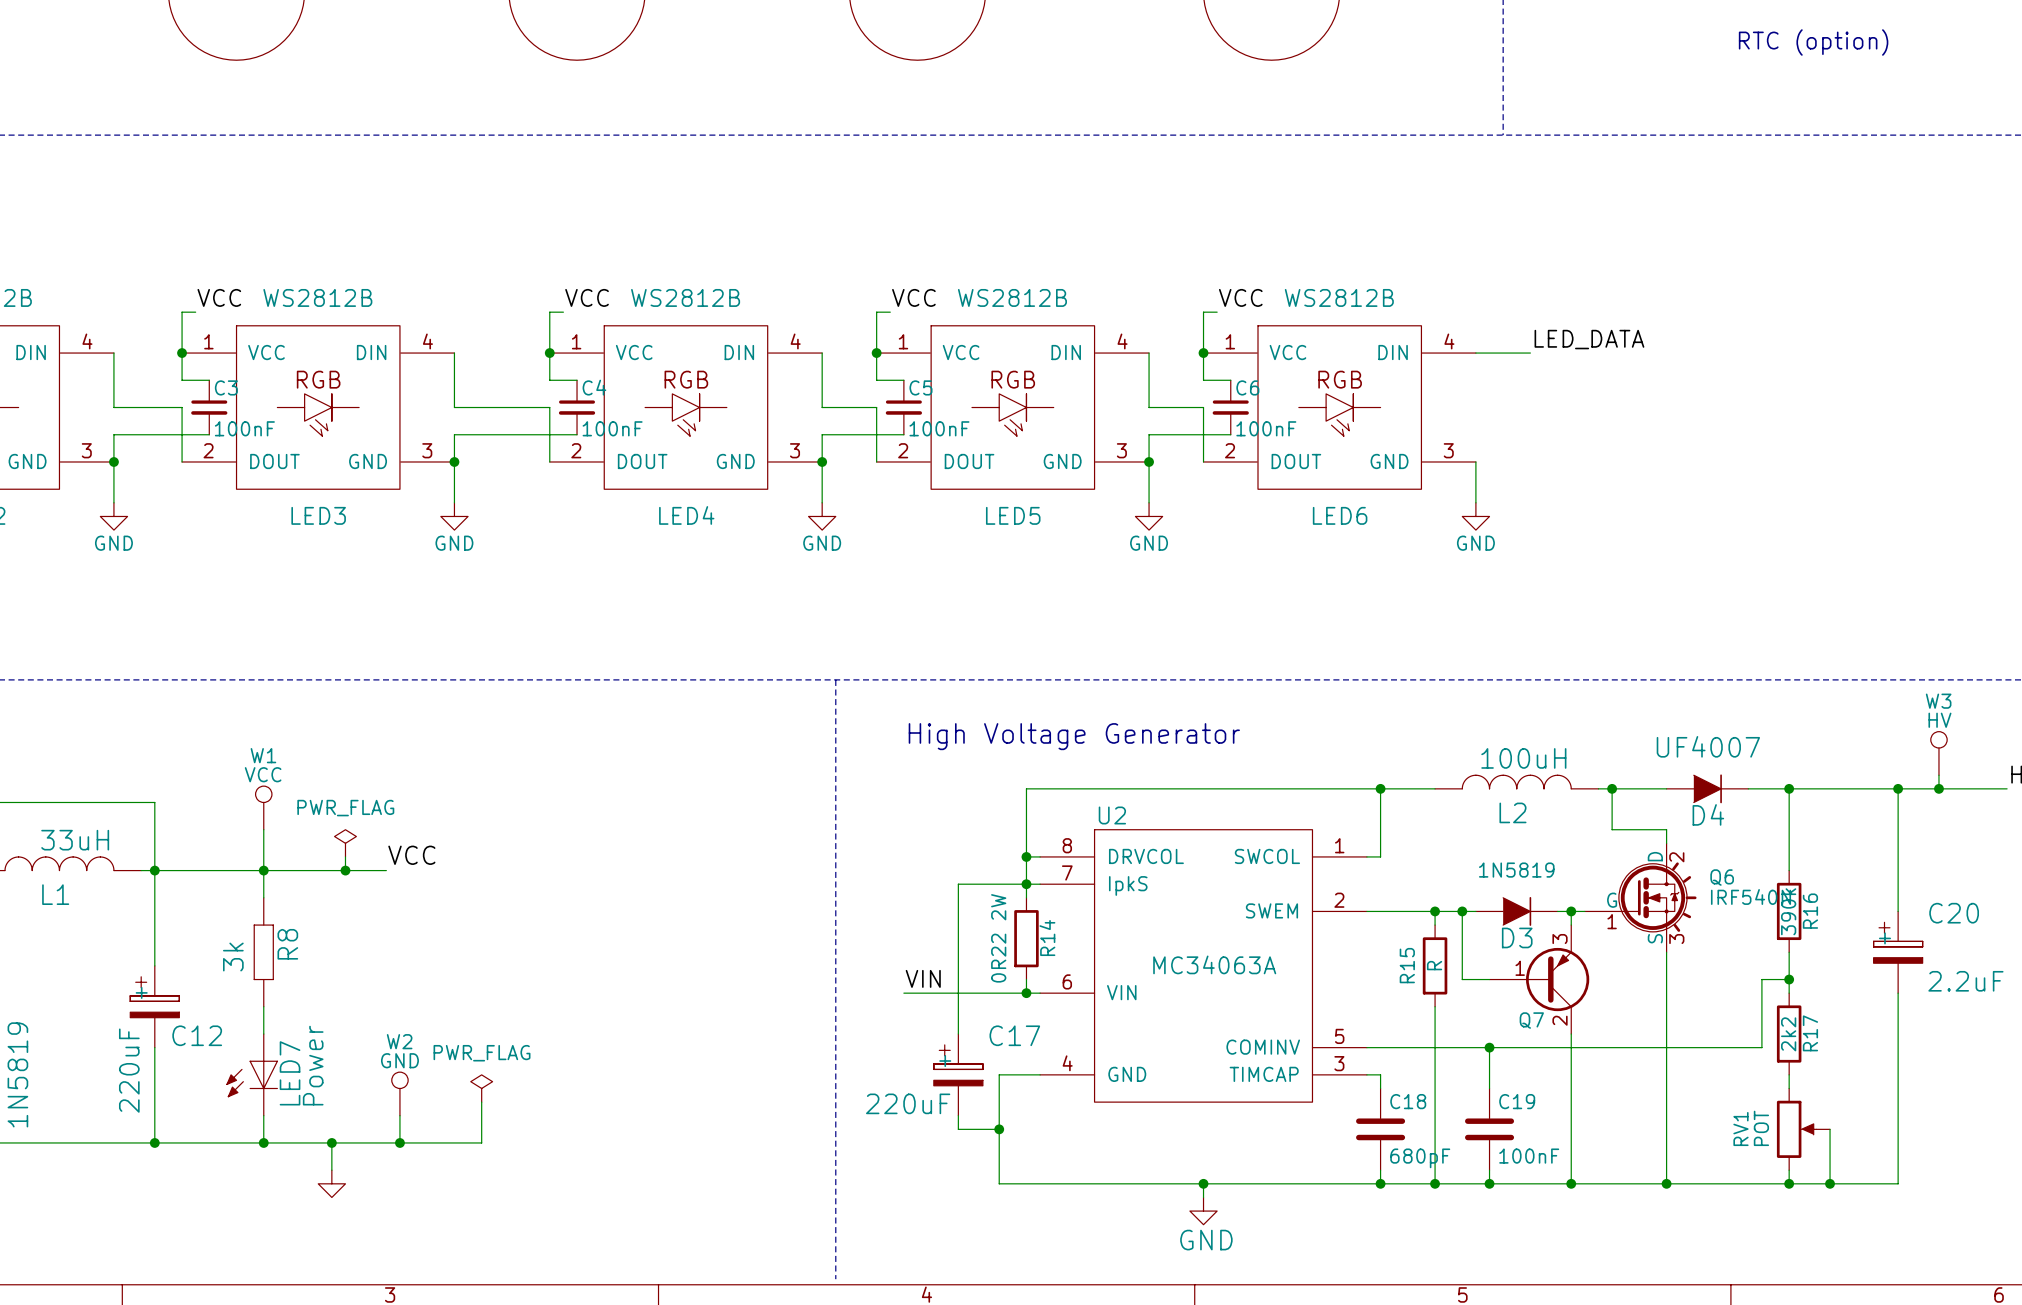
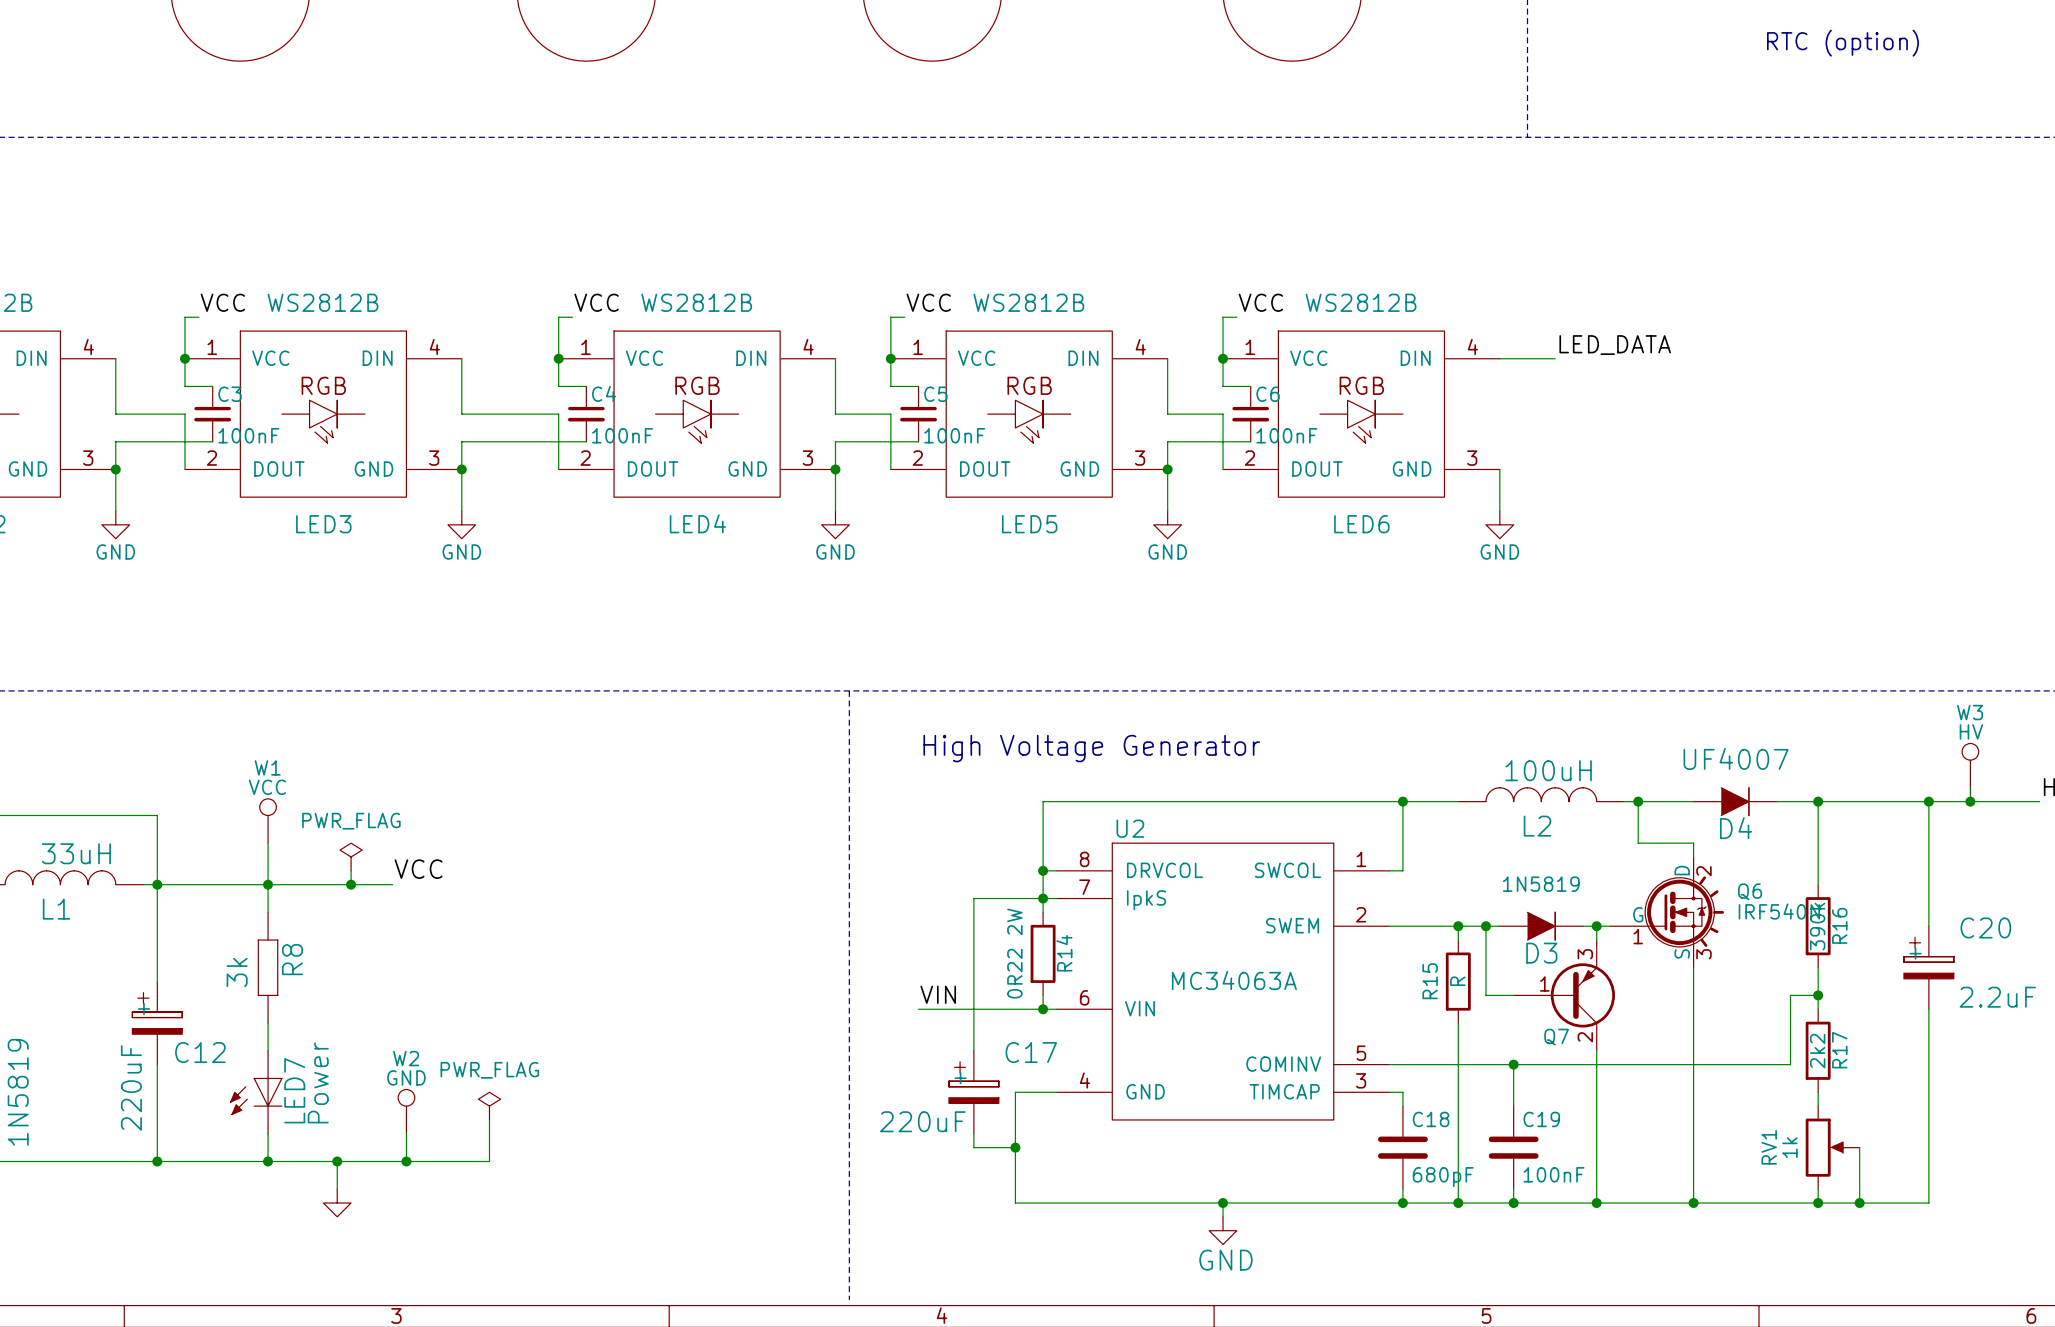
RV1 value: POT (1761, 1128) -> 1k (1789, 1147)

